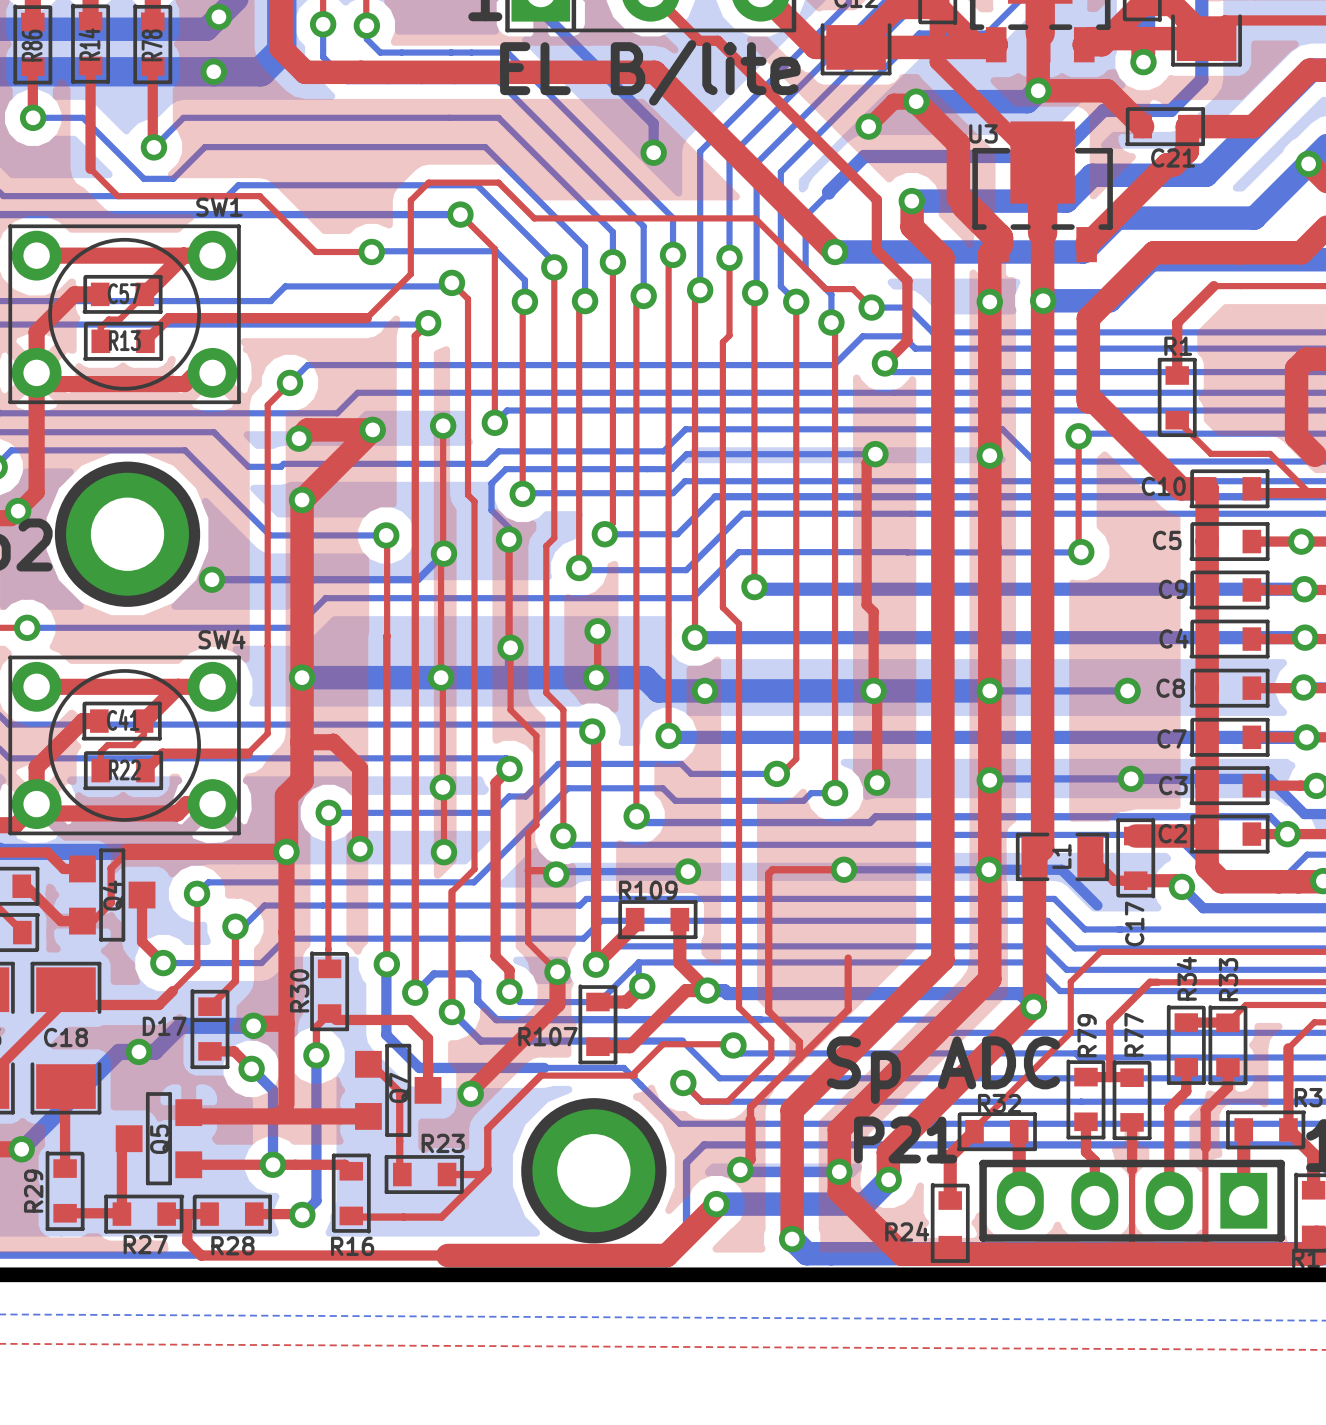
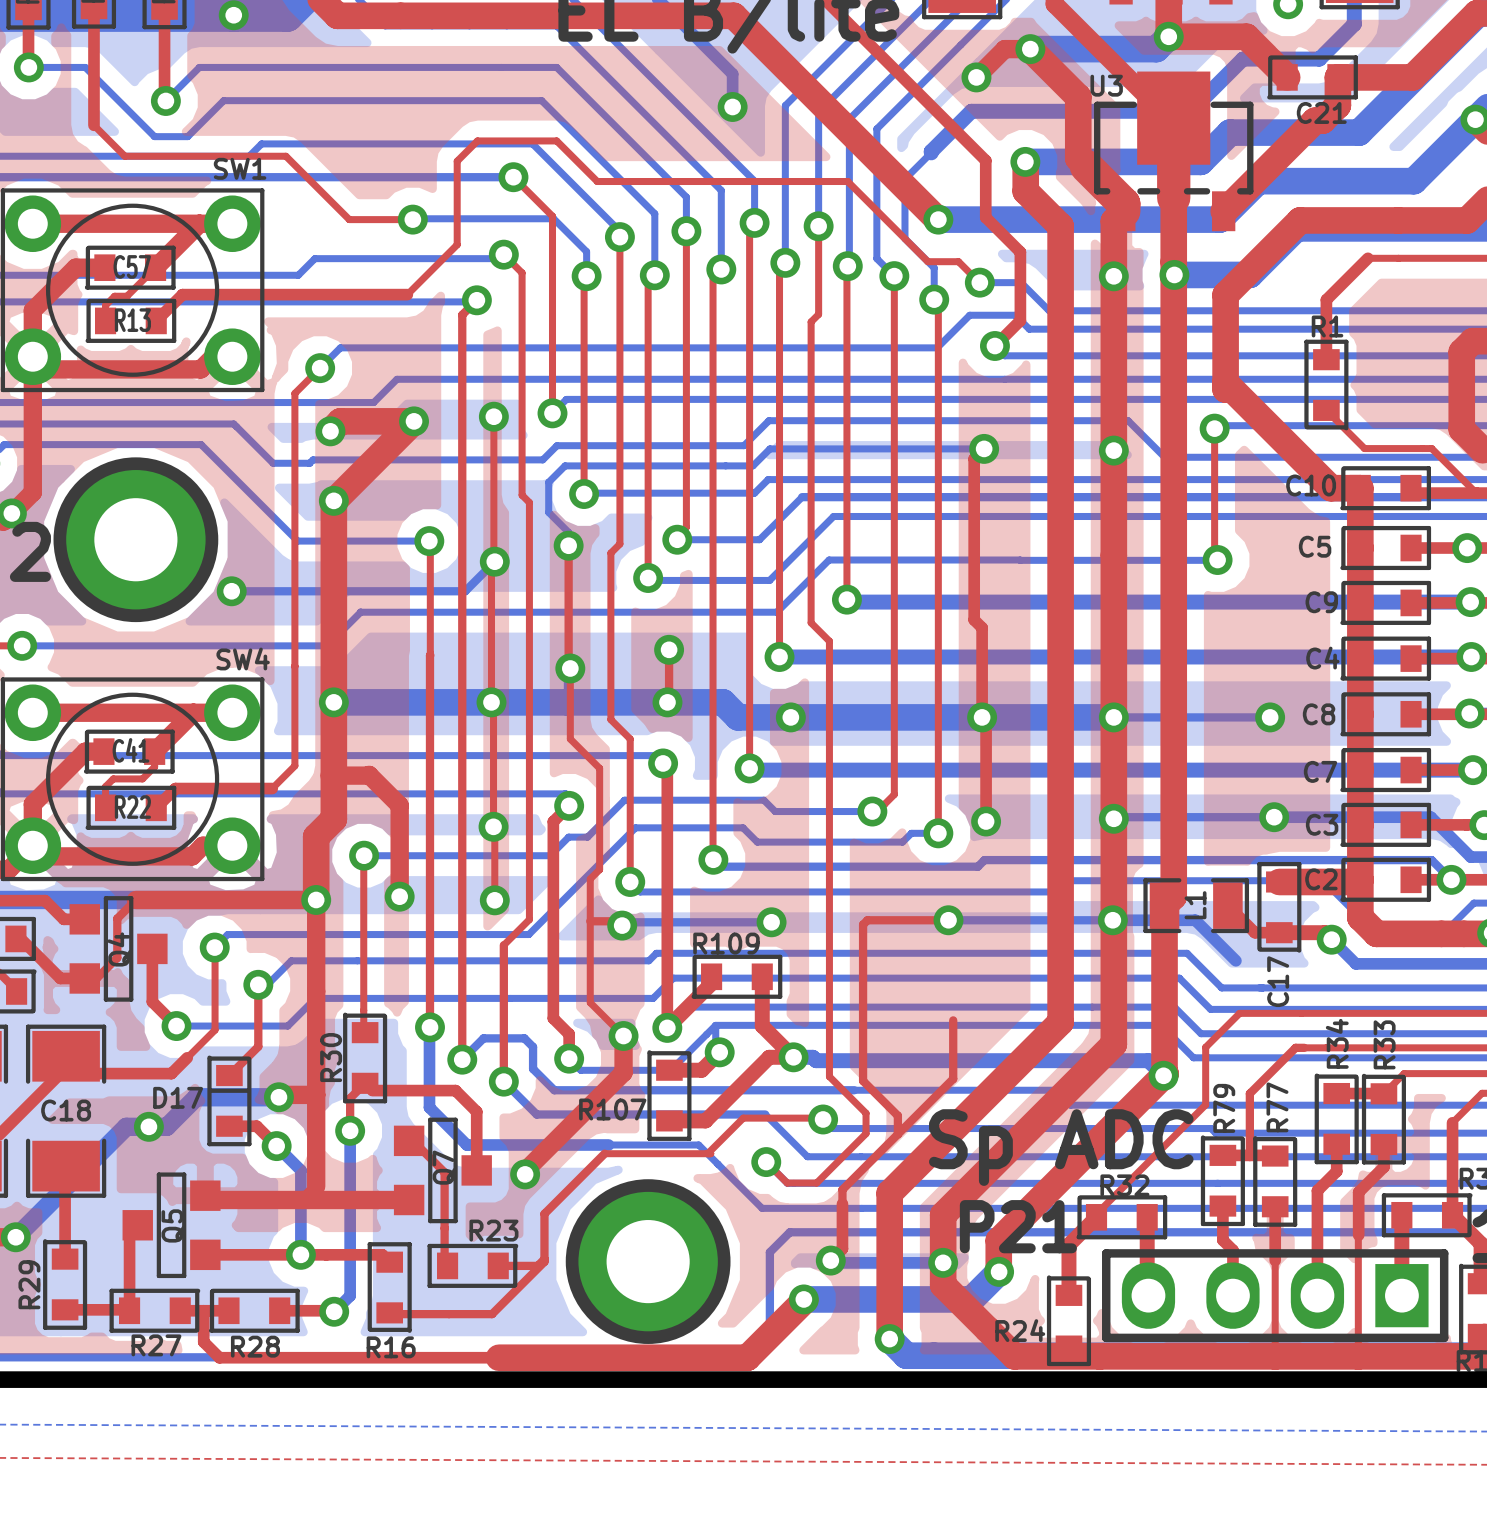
part position: (593, 1170) -> (648, 1261)

